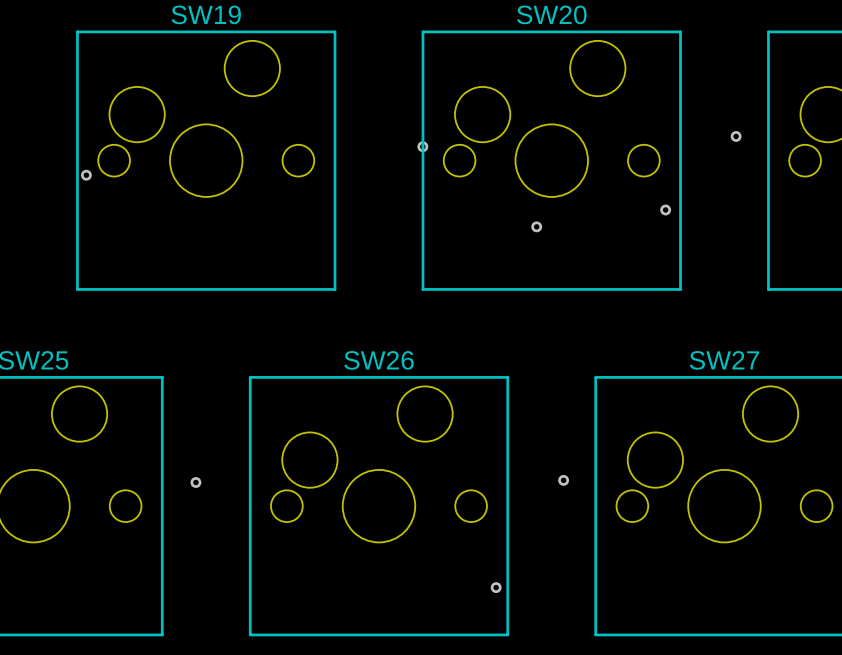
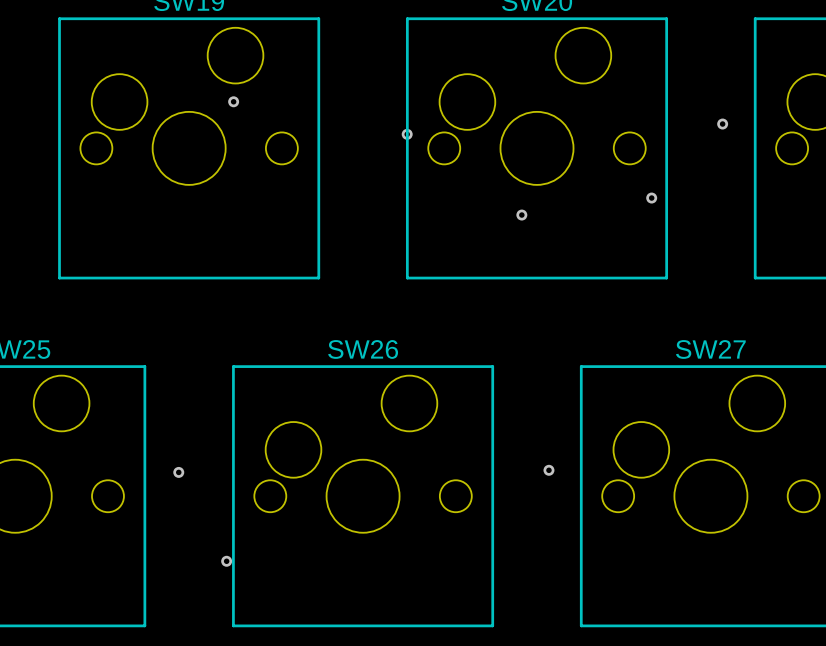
via: none -> (233, 101)
via: (86, 175) -> none
via: none -> (226, 561)
via: (496, 587) -> none

